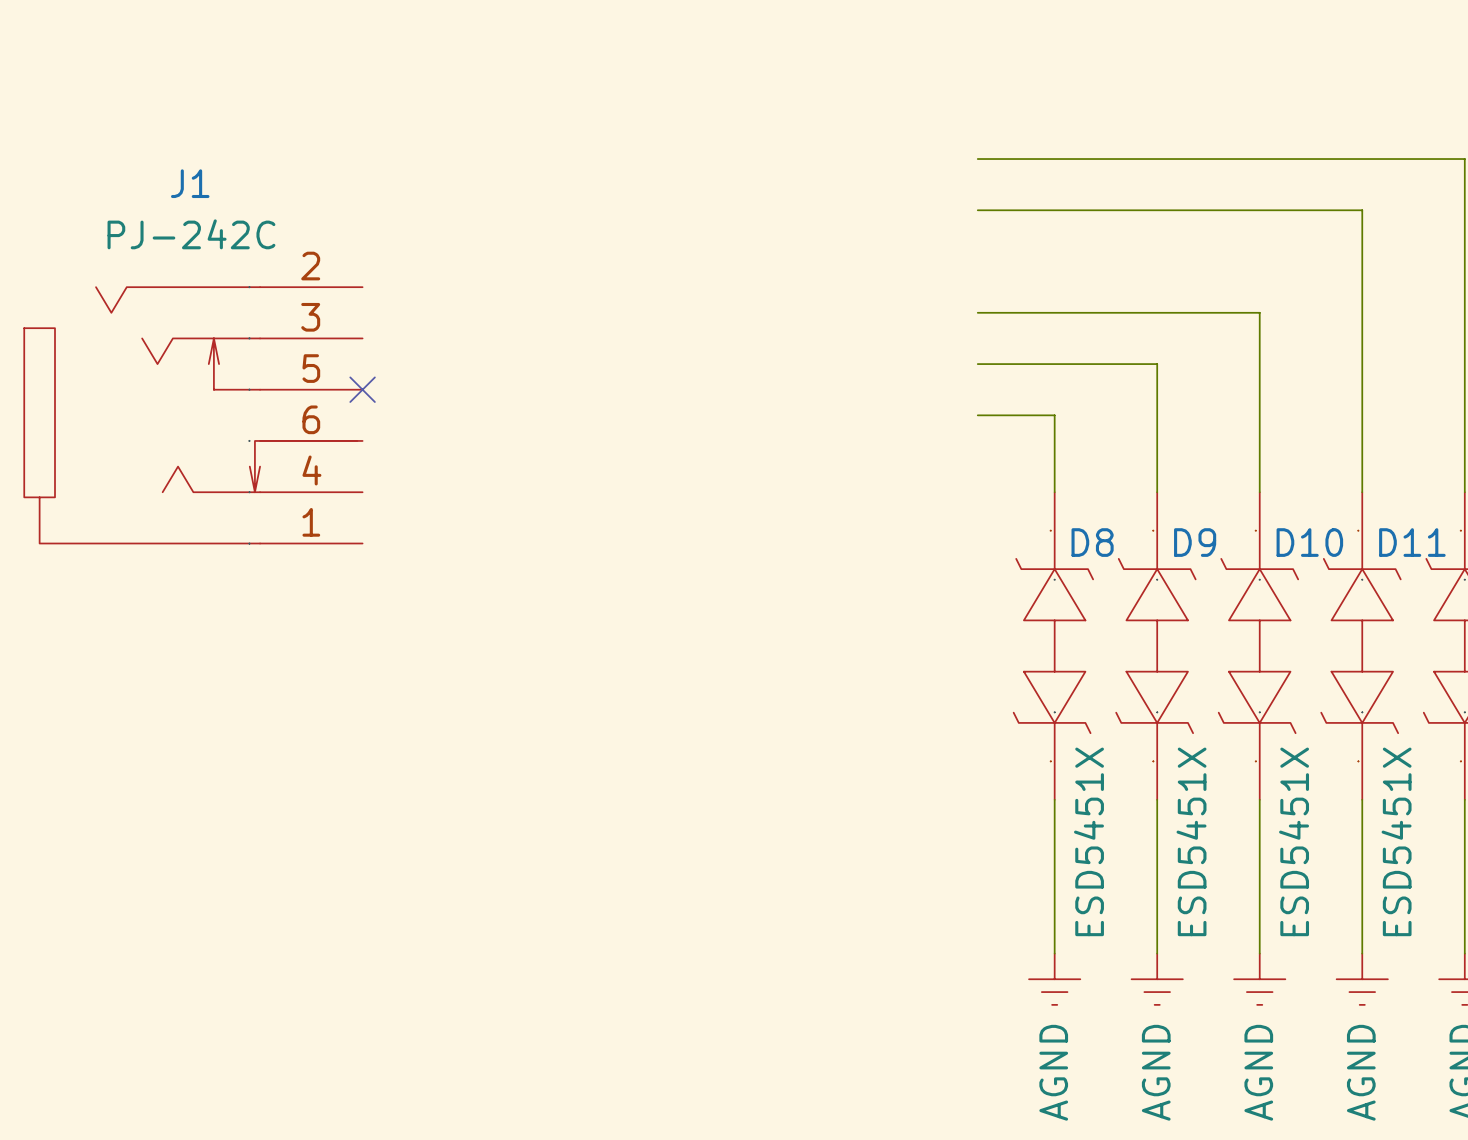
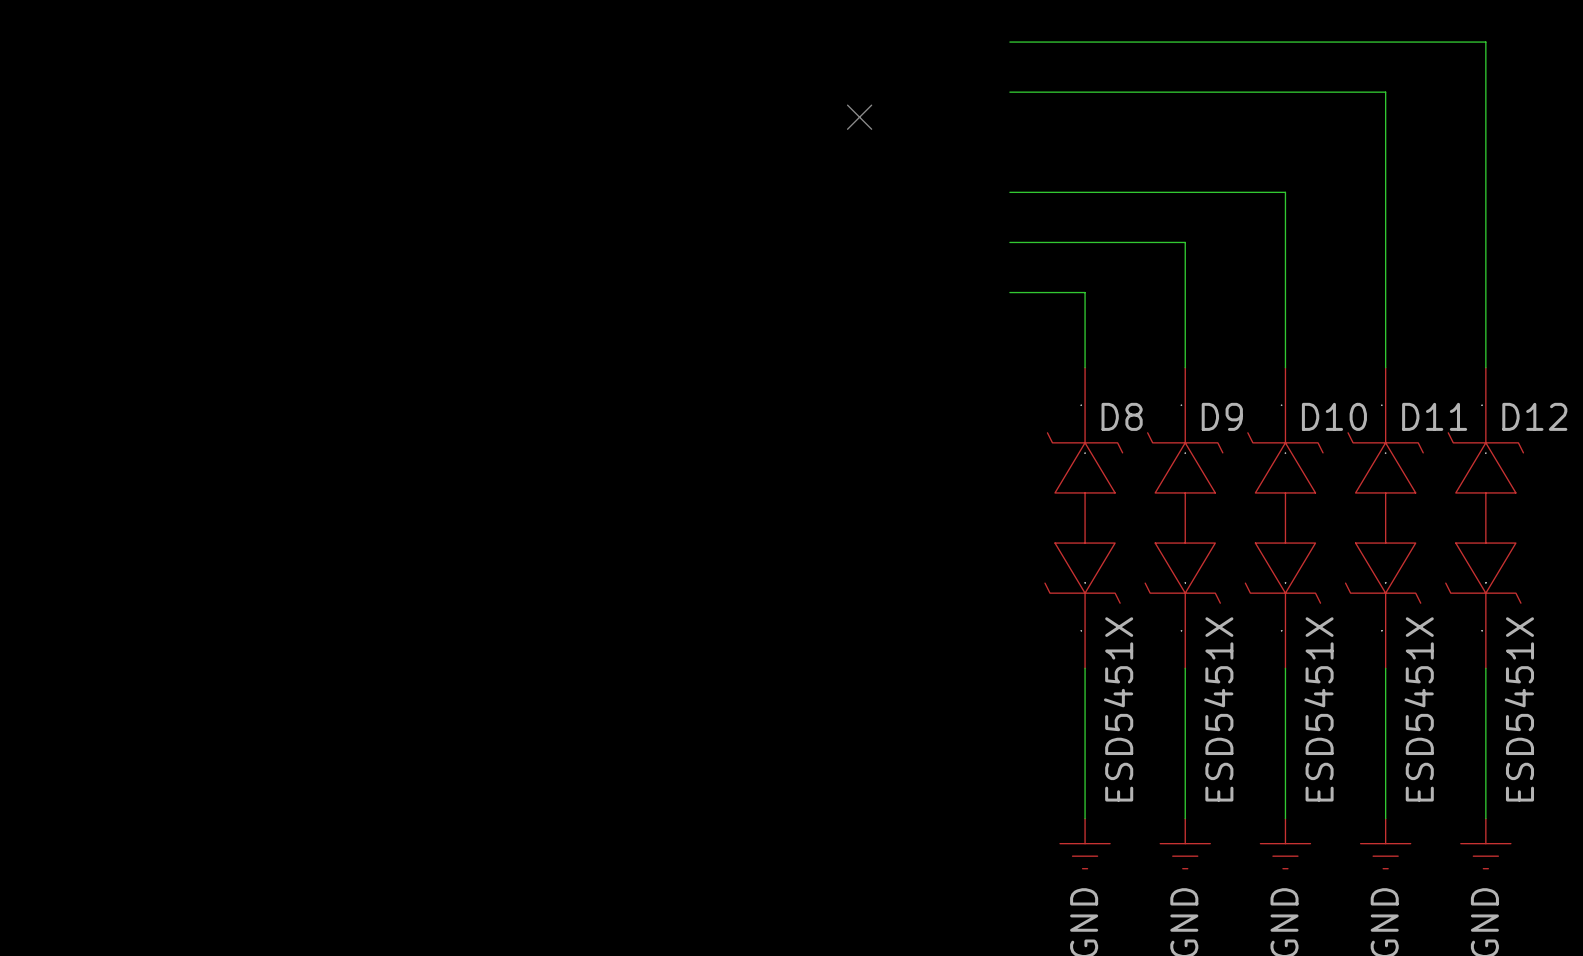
no-connect mark: none -> (859, 117)
no-connect mark: (362, 389) -> none
J1: PJ-242C (193, 415) -> none

